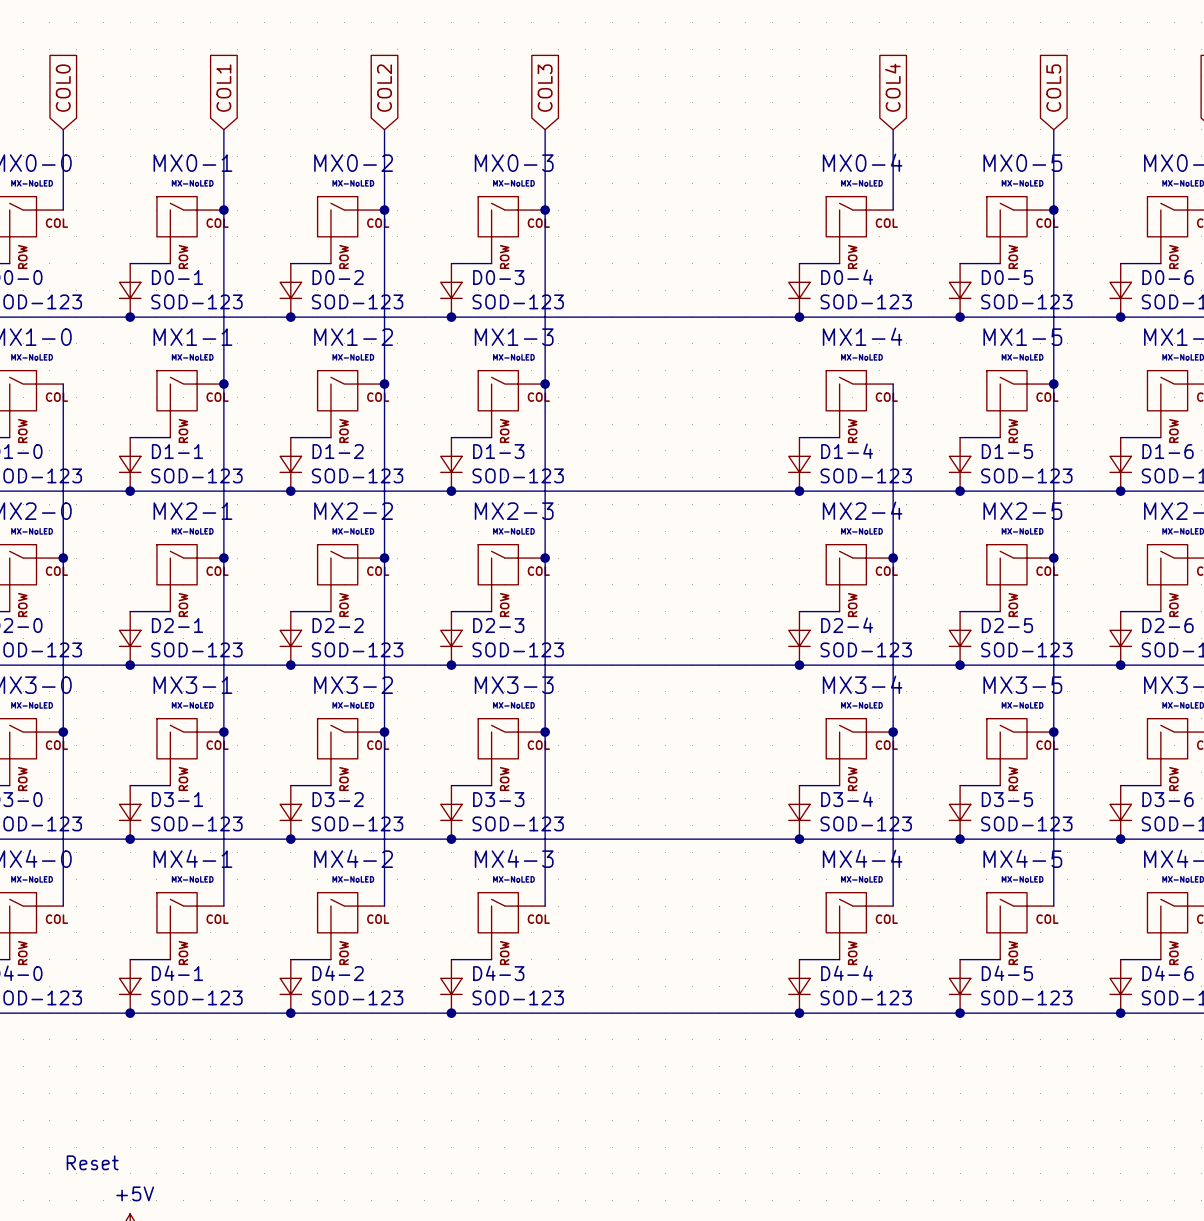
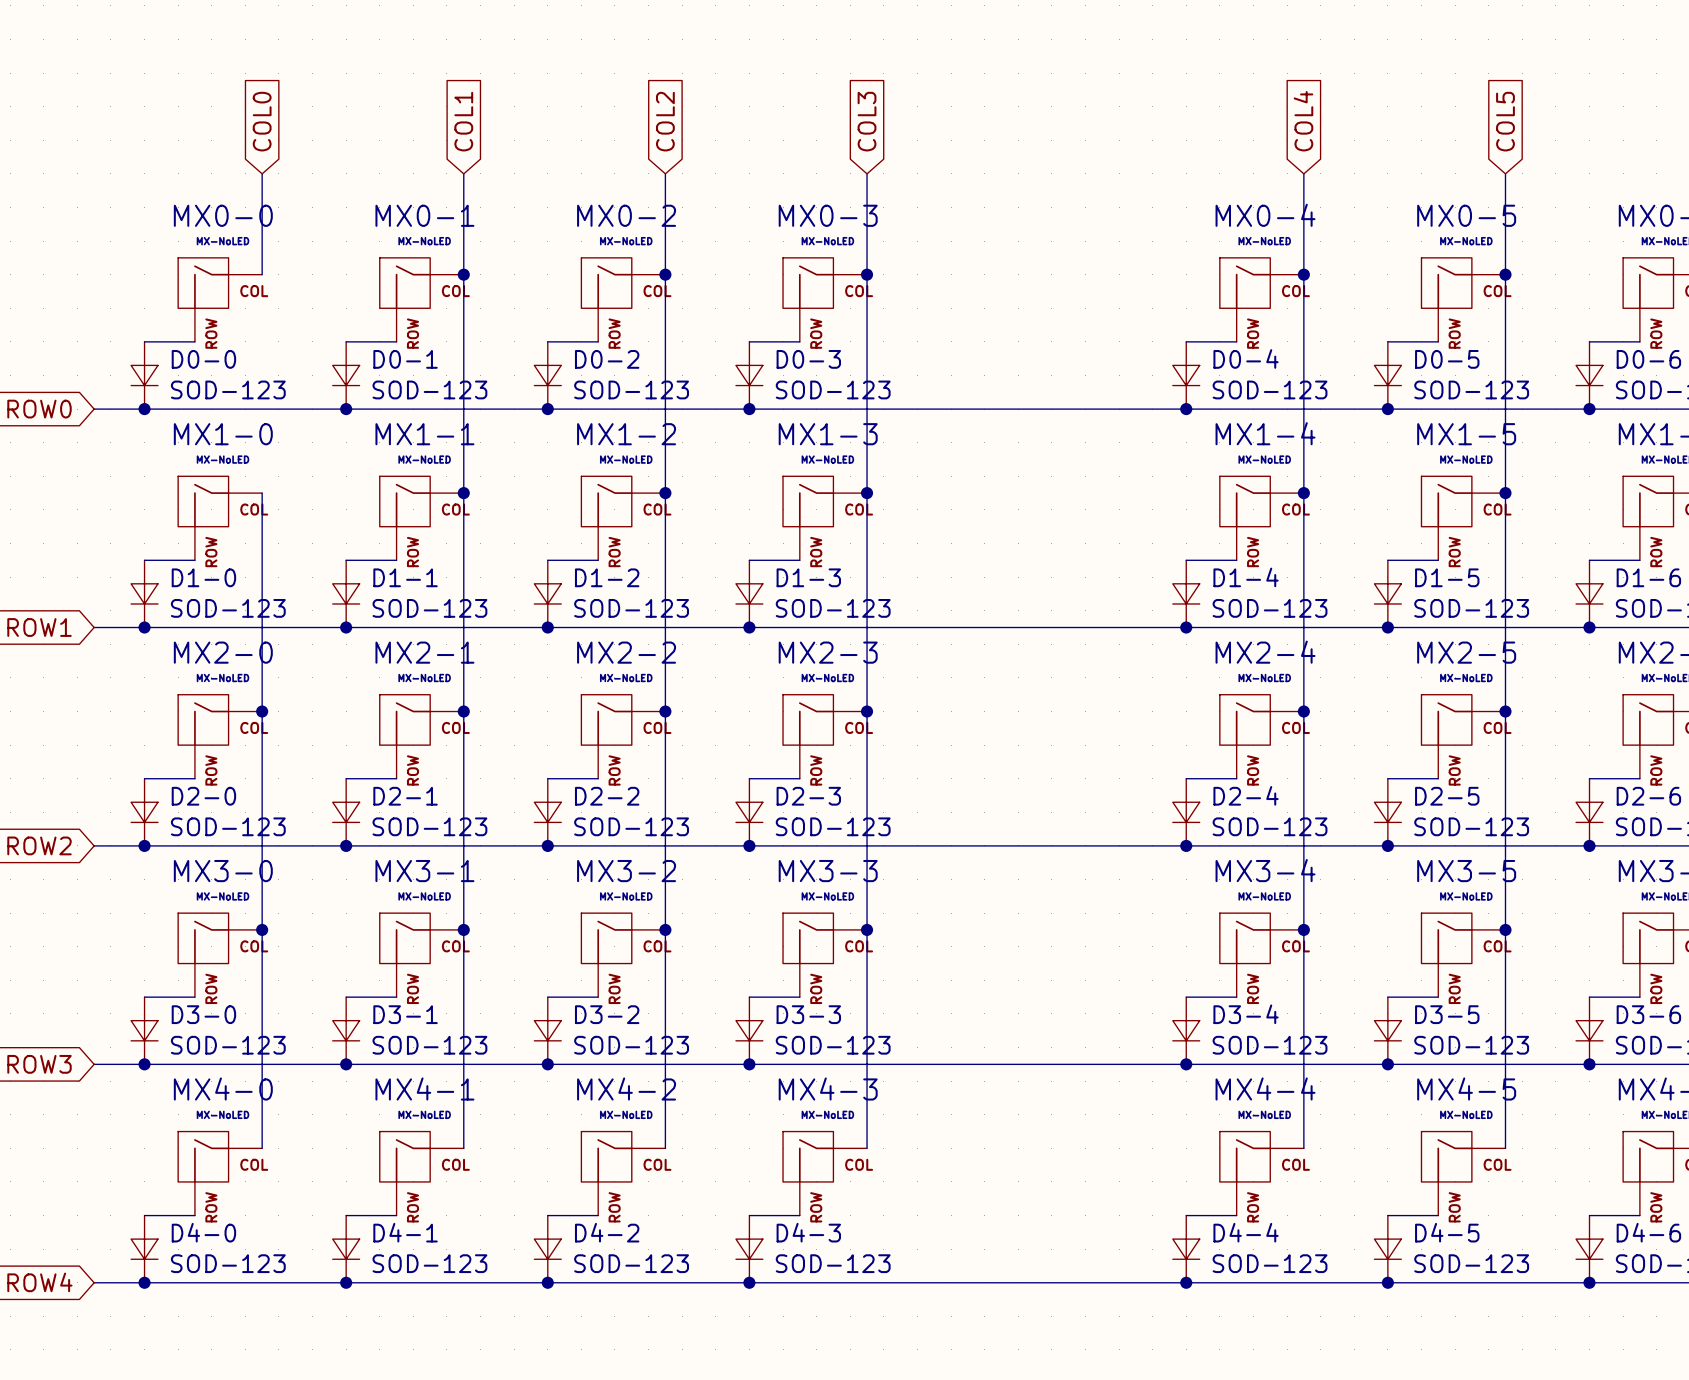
wire: none -> (1303, 274) (1303, 493)
junction: none -> (1303, 274)
junction: none -> (1303, 493)

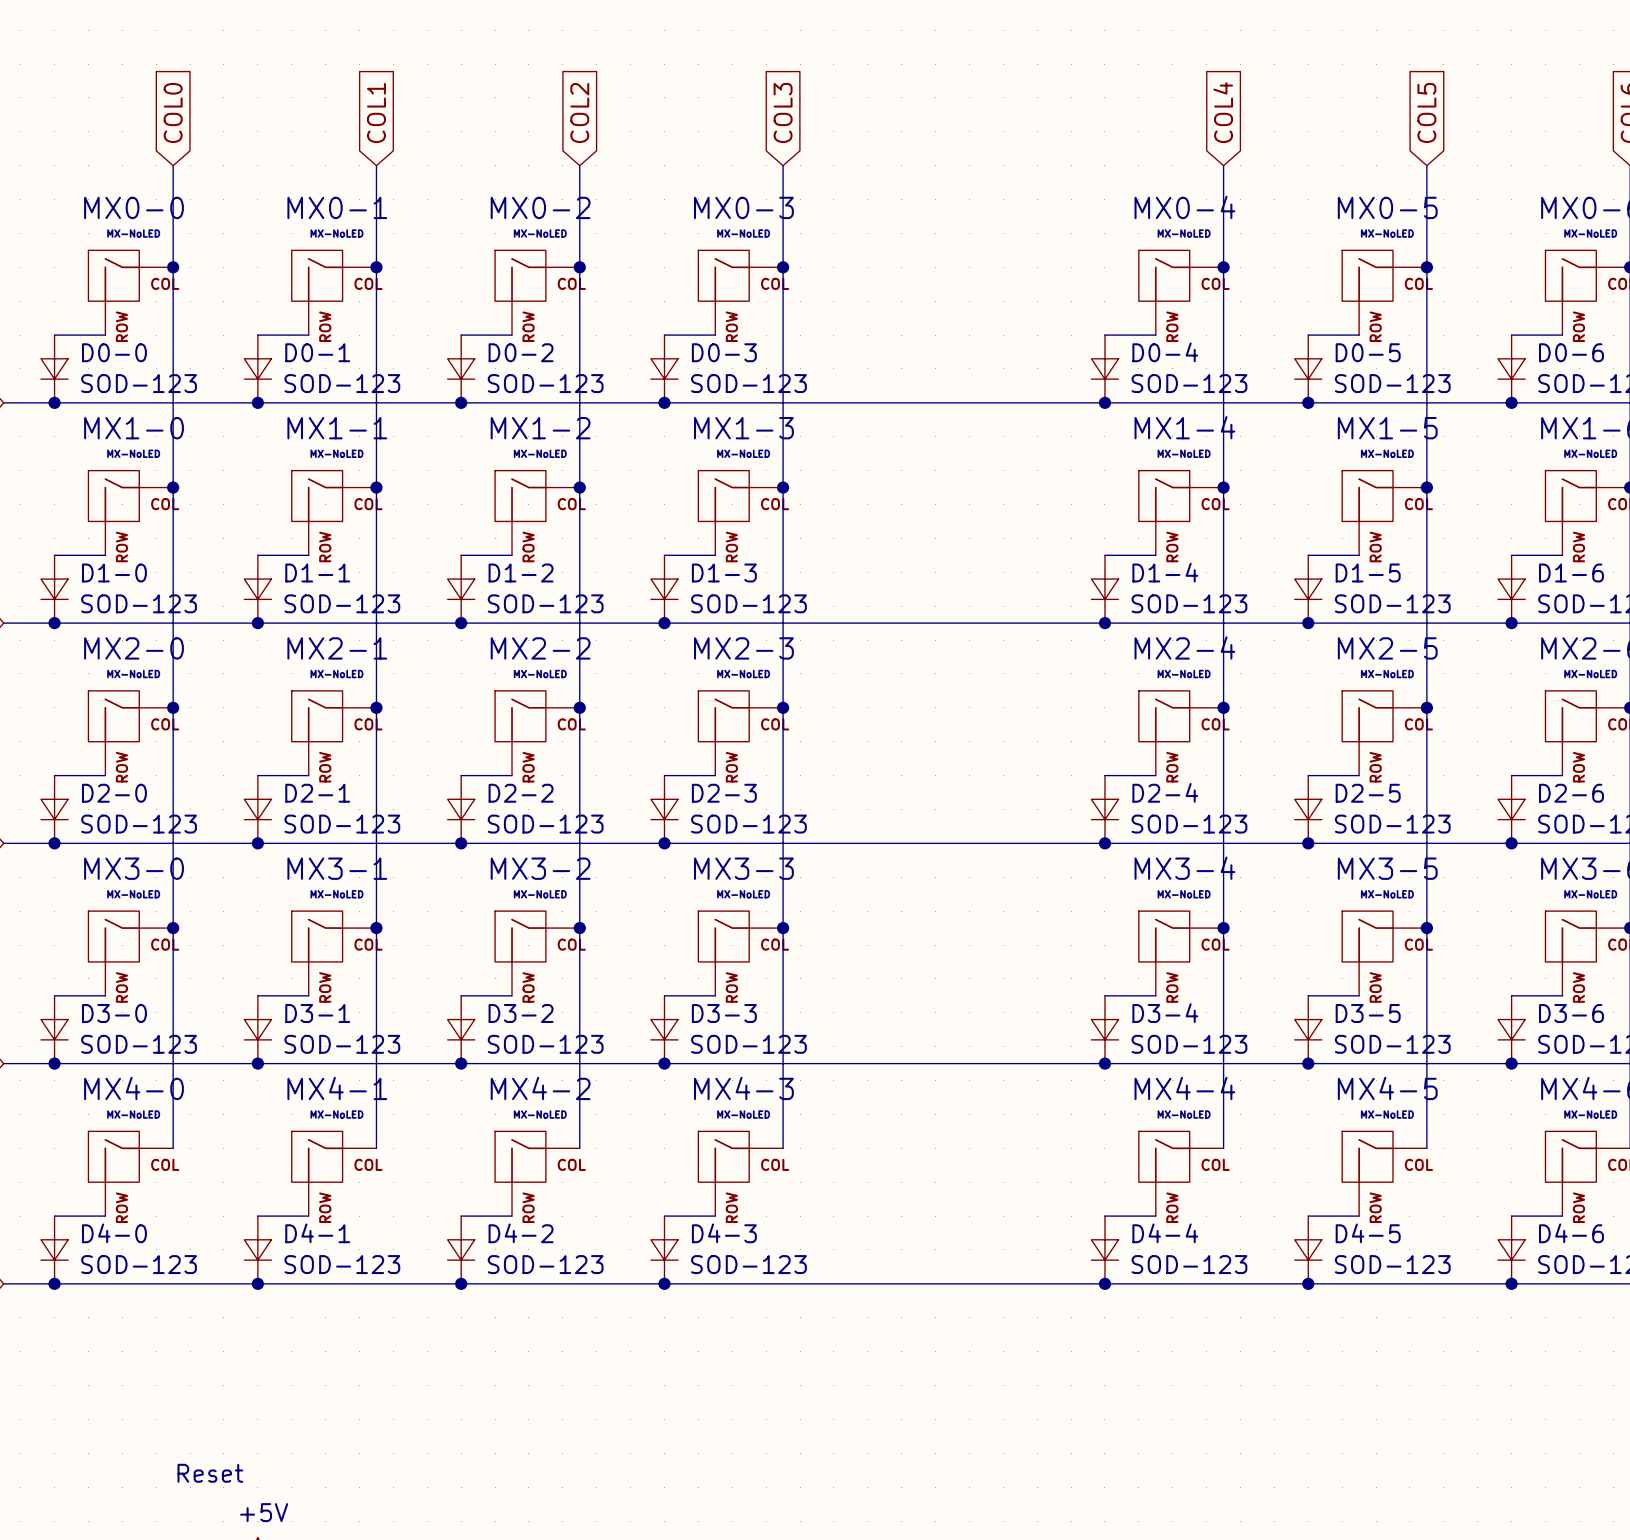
wire: none -> (173, 267) (173, 487)
junction: none -> (173, 267)
junction: none -> (173, 487)

